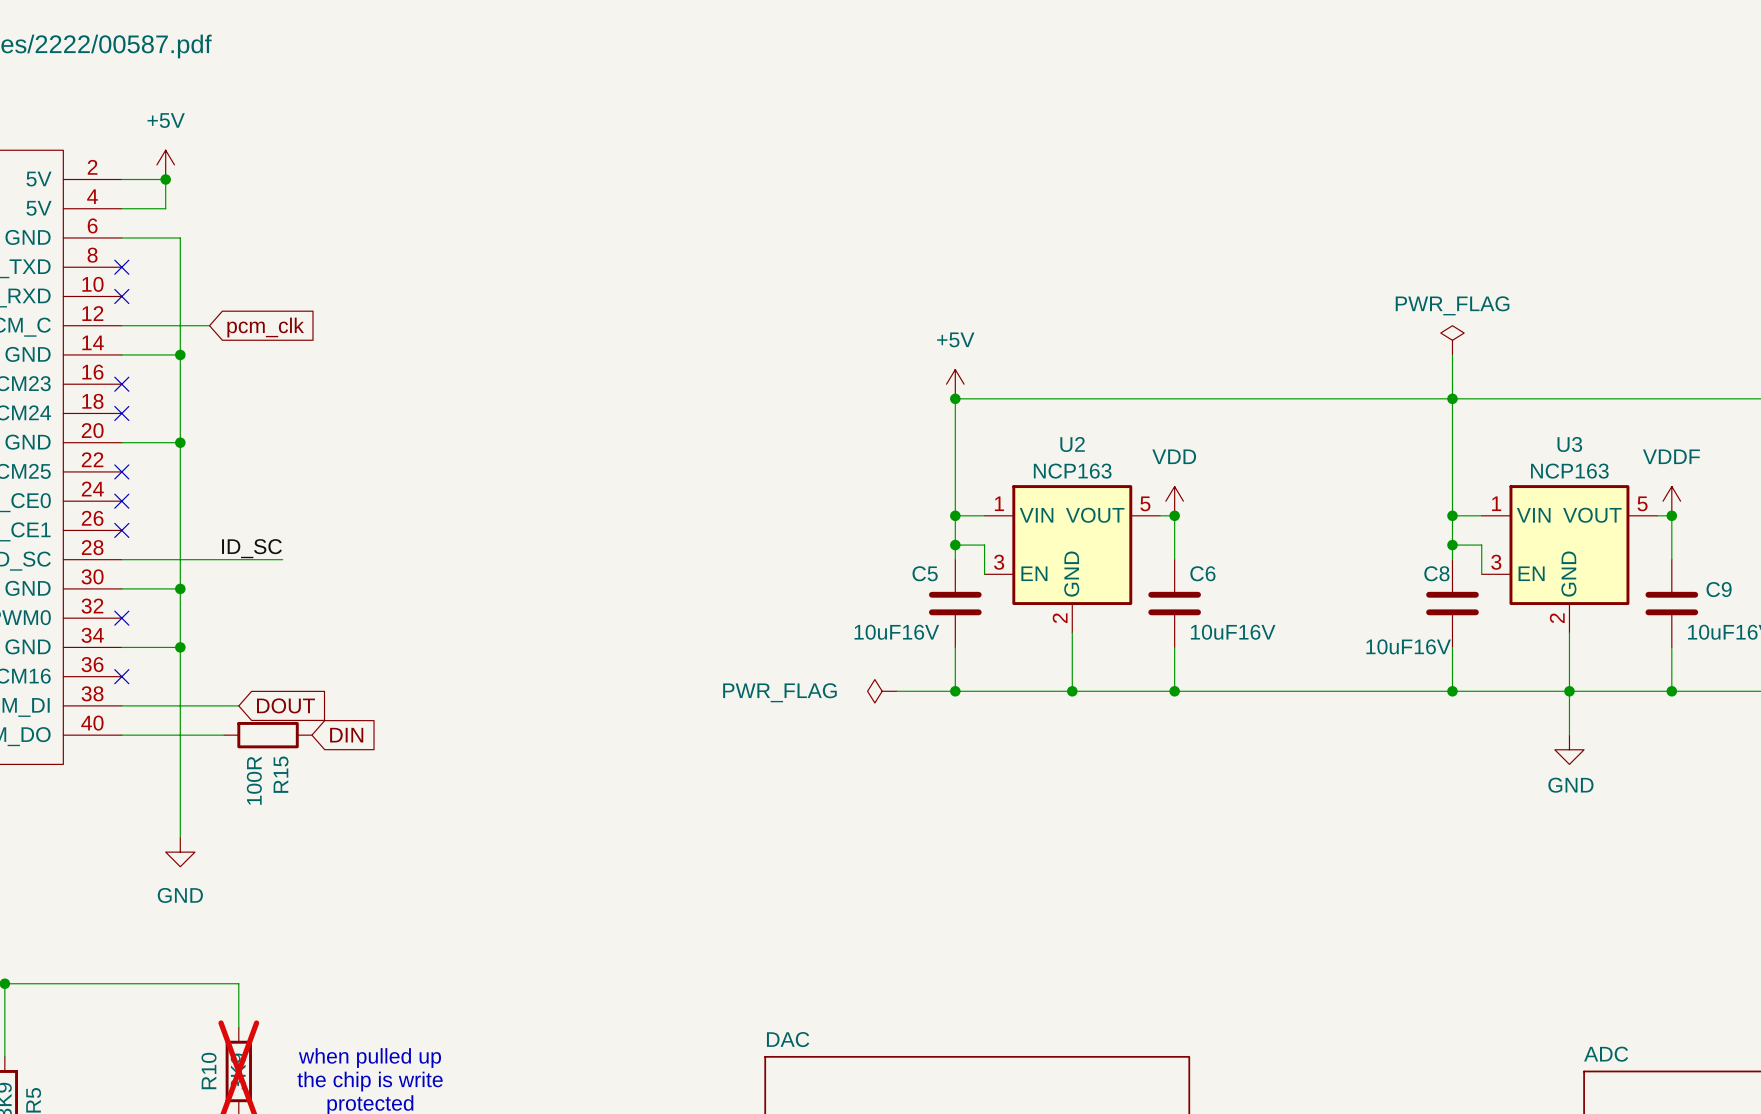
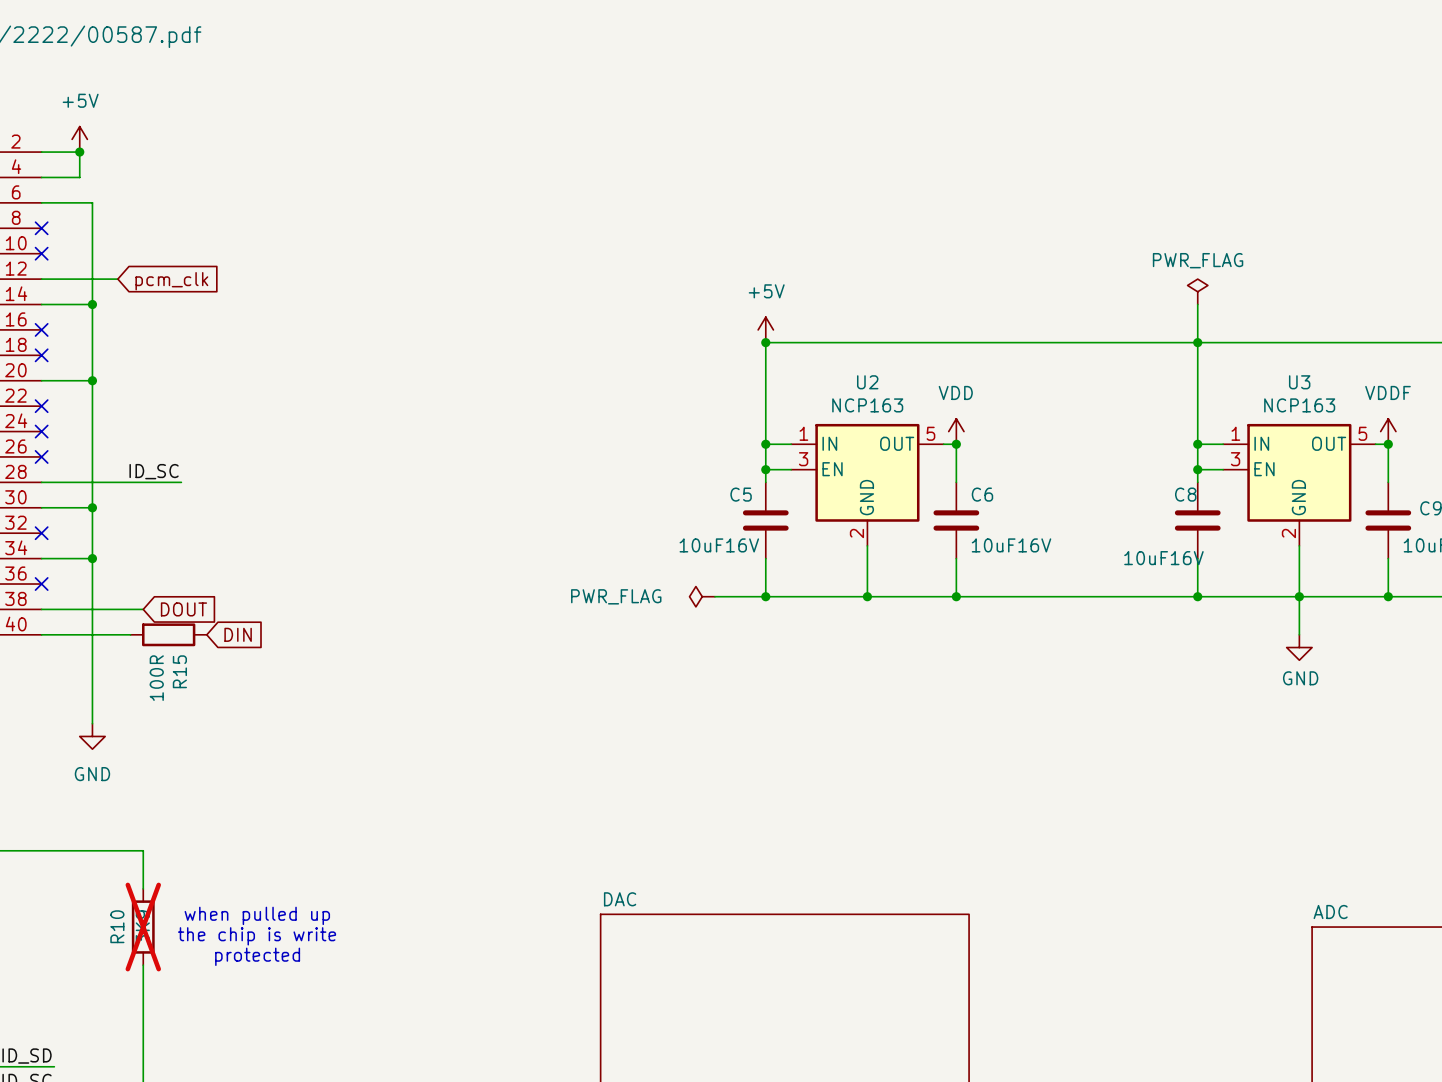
U2 symbol: [984, 485, 1161, 633] -> [791, 423, 944, 546]
U3 symbol: [1481, 485, 1658, 633] -> [1223, 423, 1376, 546]
wire: (984, 545) (984, 574) -> none
wire: (1481, 545) (1481, 574) -> none

